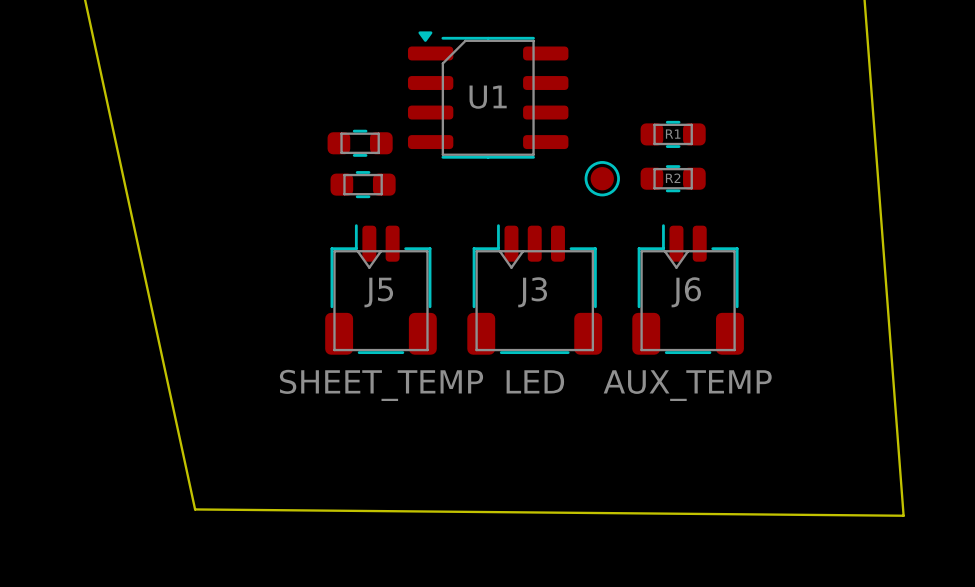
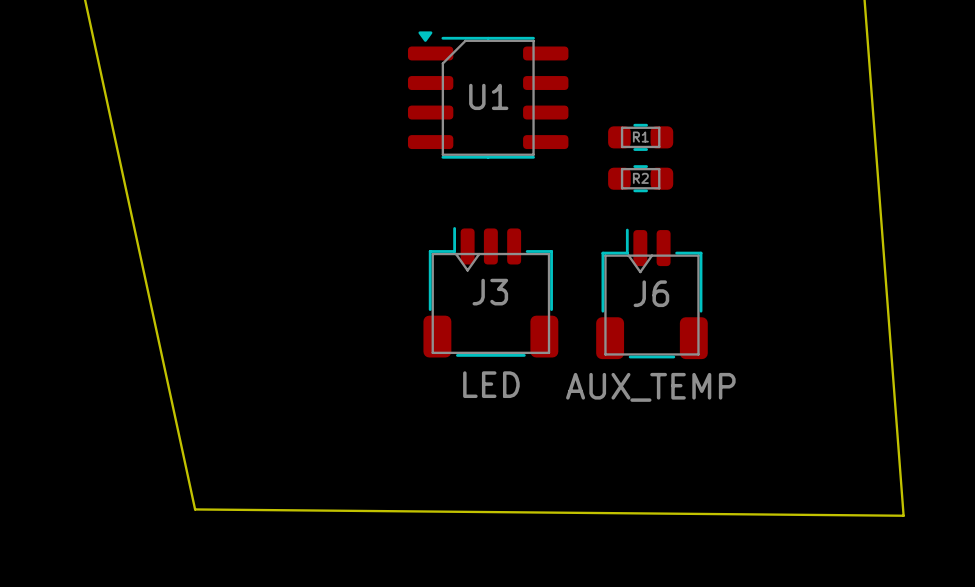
R1 position: (673, 134) -> (640, 137)
part: (360, 143) -> none
part: (602, 178) -> none
R2 position: (673, 178) -> (640, 178)
part: (363, 184) -> none
J5: SHEET_TEMP (380, 289) -> none
J3 position: (534, 289) -> (490, 292)
J6 position: (688, 289) -> (651, 293)

